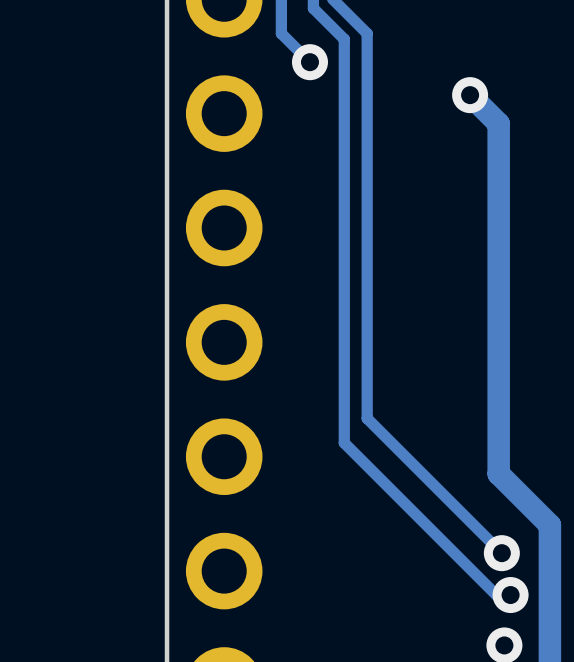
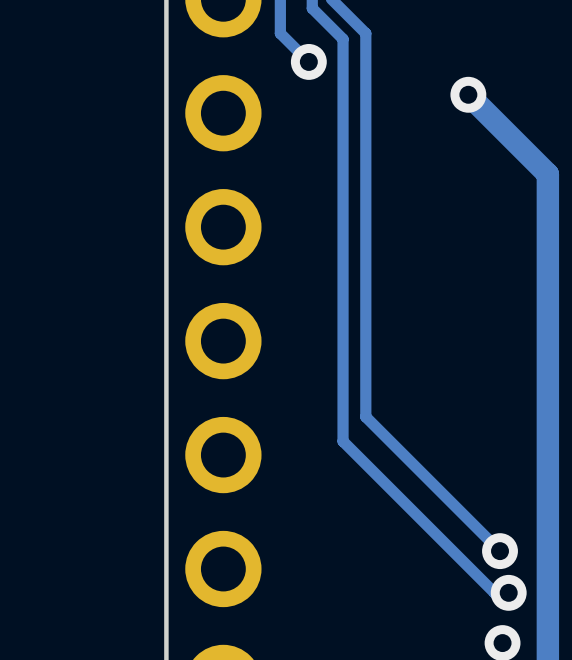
track: (498, 123) (498, 473) (549, 525) -> (496, 123) (547, 174) (547, 523)

